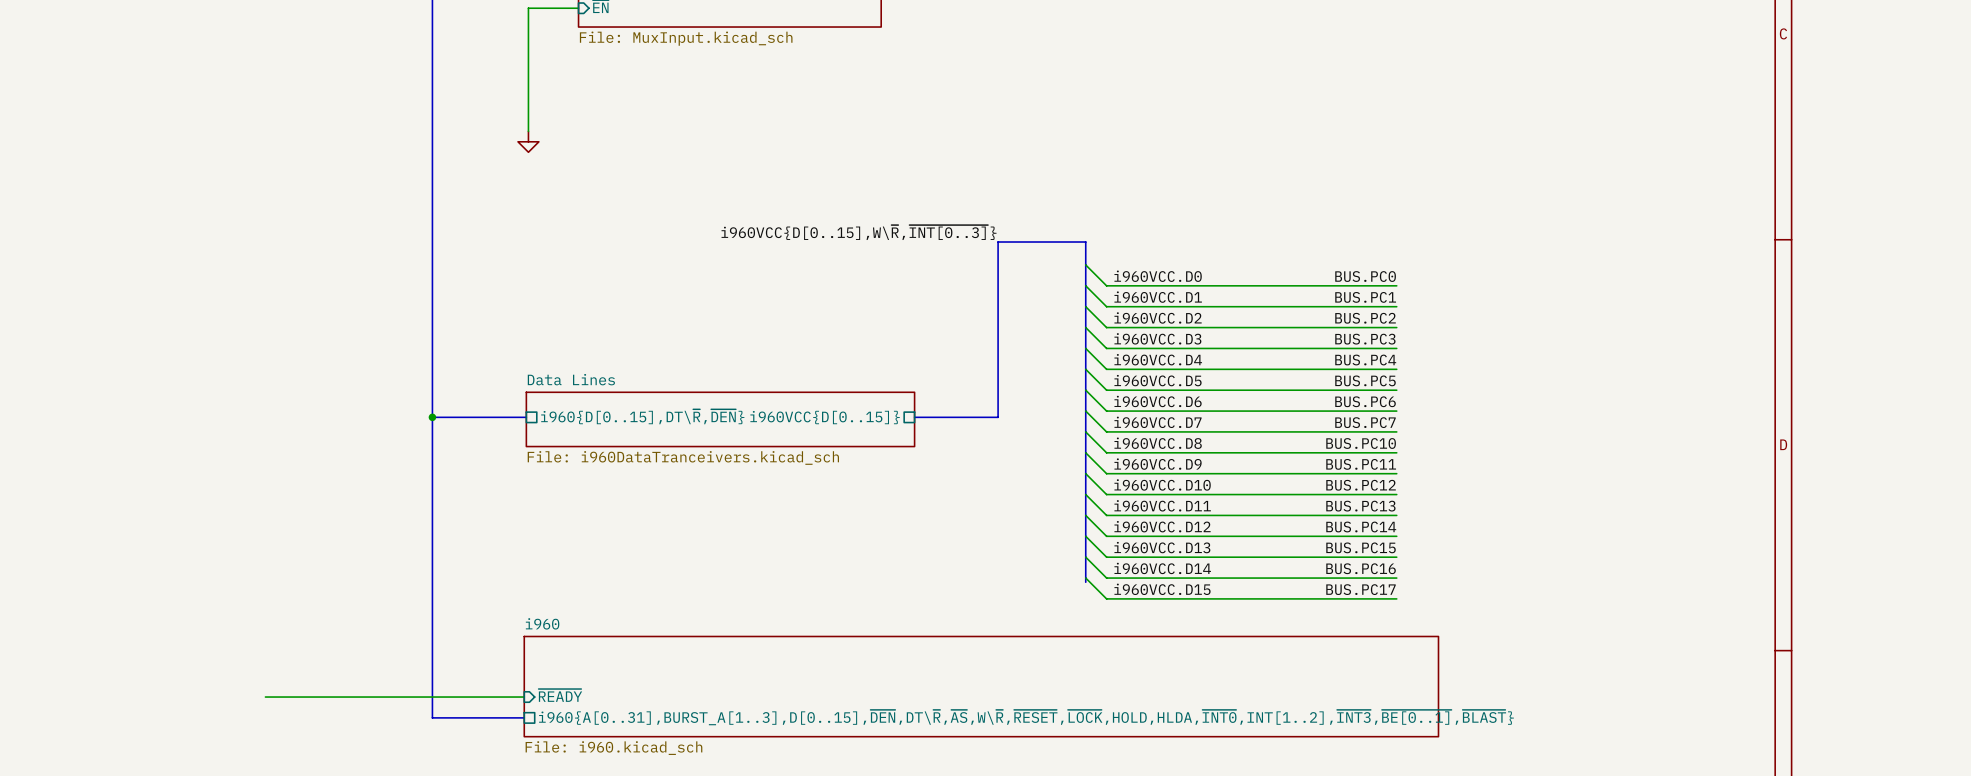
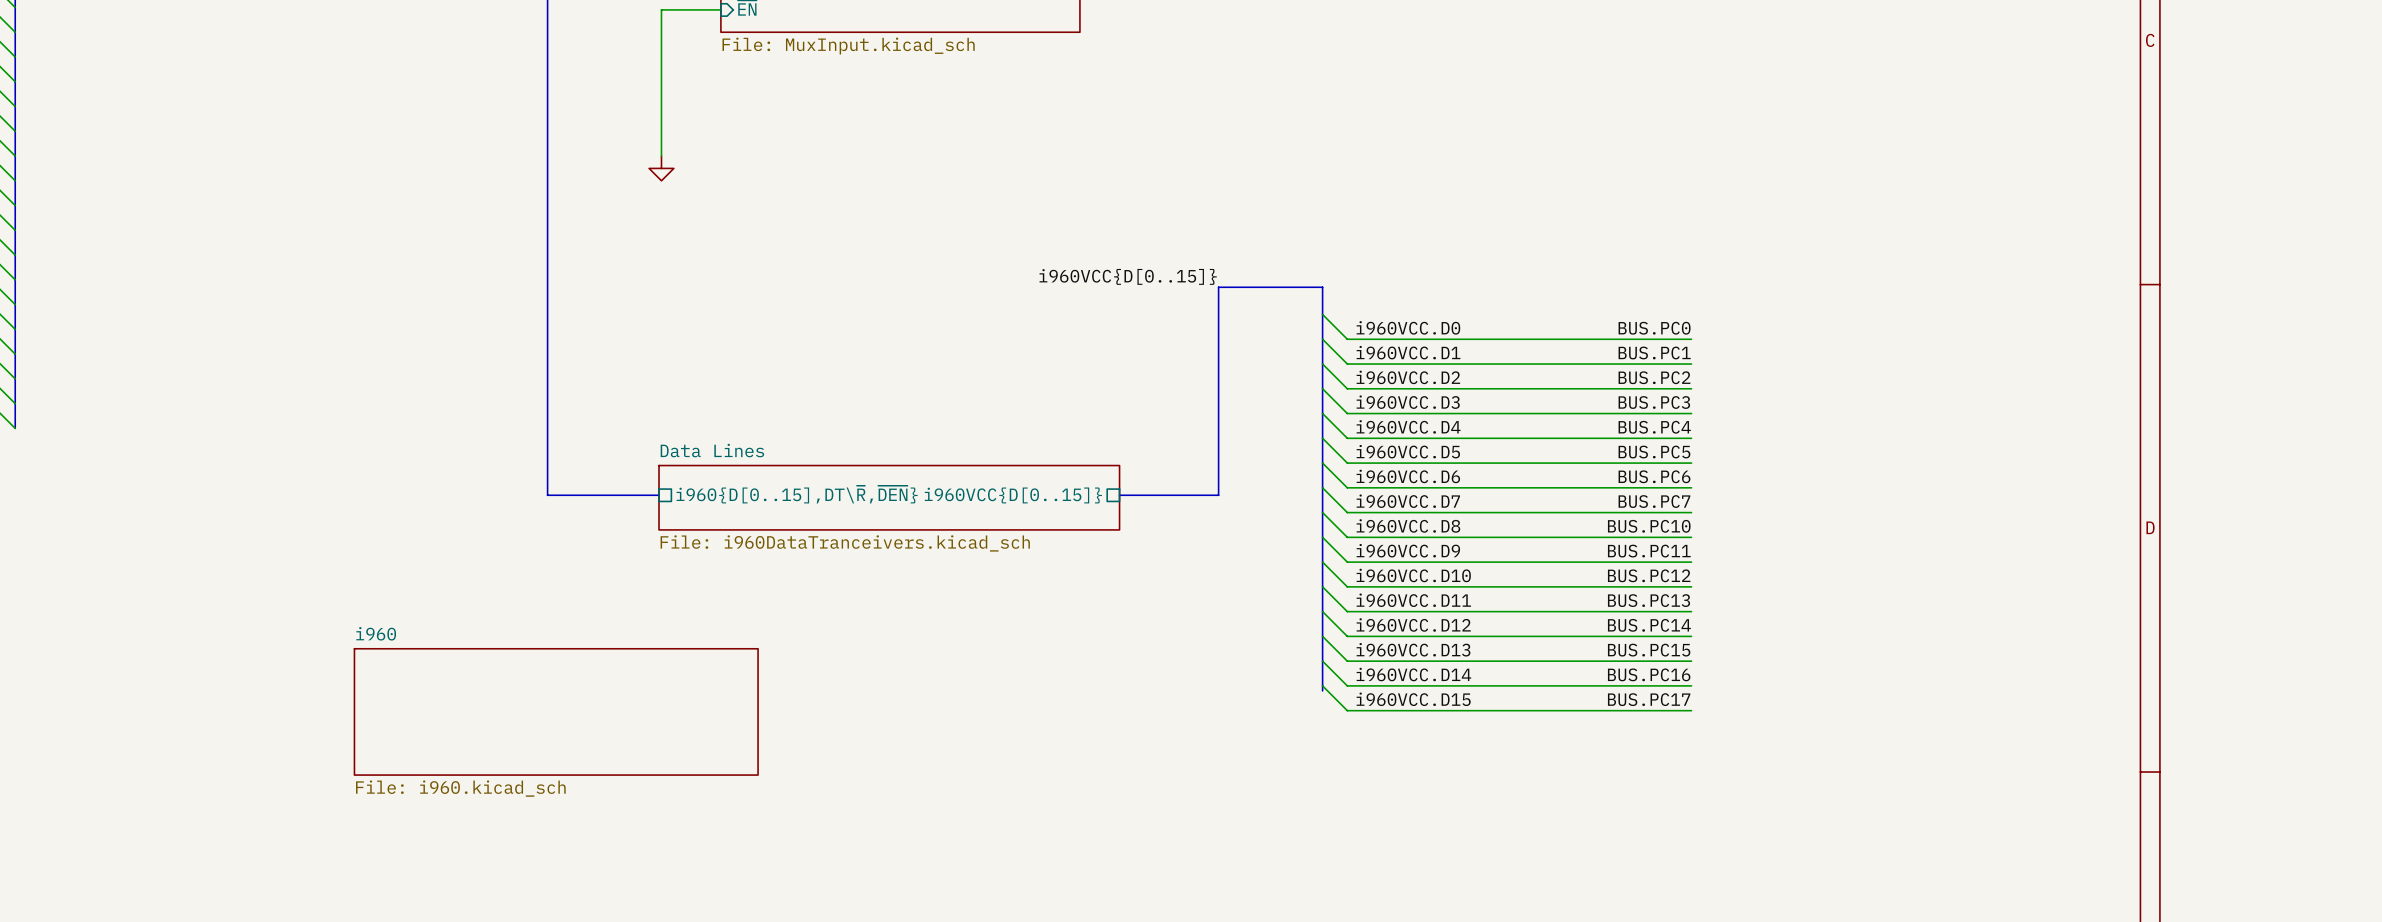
label: i960VCC{D[0..15],W\~{R},~{INT[0..3]}} (859, 232) -> i960VCC{D[0..15]} (1128, 276)
bus: (432, 417) (432, 717) (524, 717) -> none
junction: (432, 417) -> none
sheet i960 name position: i960 (542, 623) -> i960 (376, 633)
sheet i960 shape: [523, 635, 1440, 738] -> [353, 648, 759, 776]
sheet pin: ~{READY} (560, 695) -> none
wire: (265, 697) (524, 697) -> none
sheet pin: i960{A[0..31],BURST_A[1..3],D[0..15],~{DEN},DT\~{R},~{AS},W\~{R},~{RESET},~{LOCK},HOLD,HLDA,~{INT0},INT[1..2],~{INT3},~{BE[0..1]},~{BLAST}} (1026, 717) -> none
sheet i960 value position: File: i960.kicad_sch (613, 748) -> File: i960.kicad_sch (460, 788)

